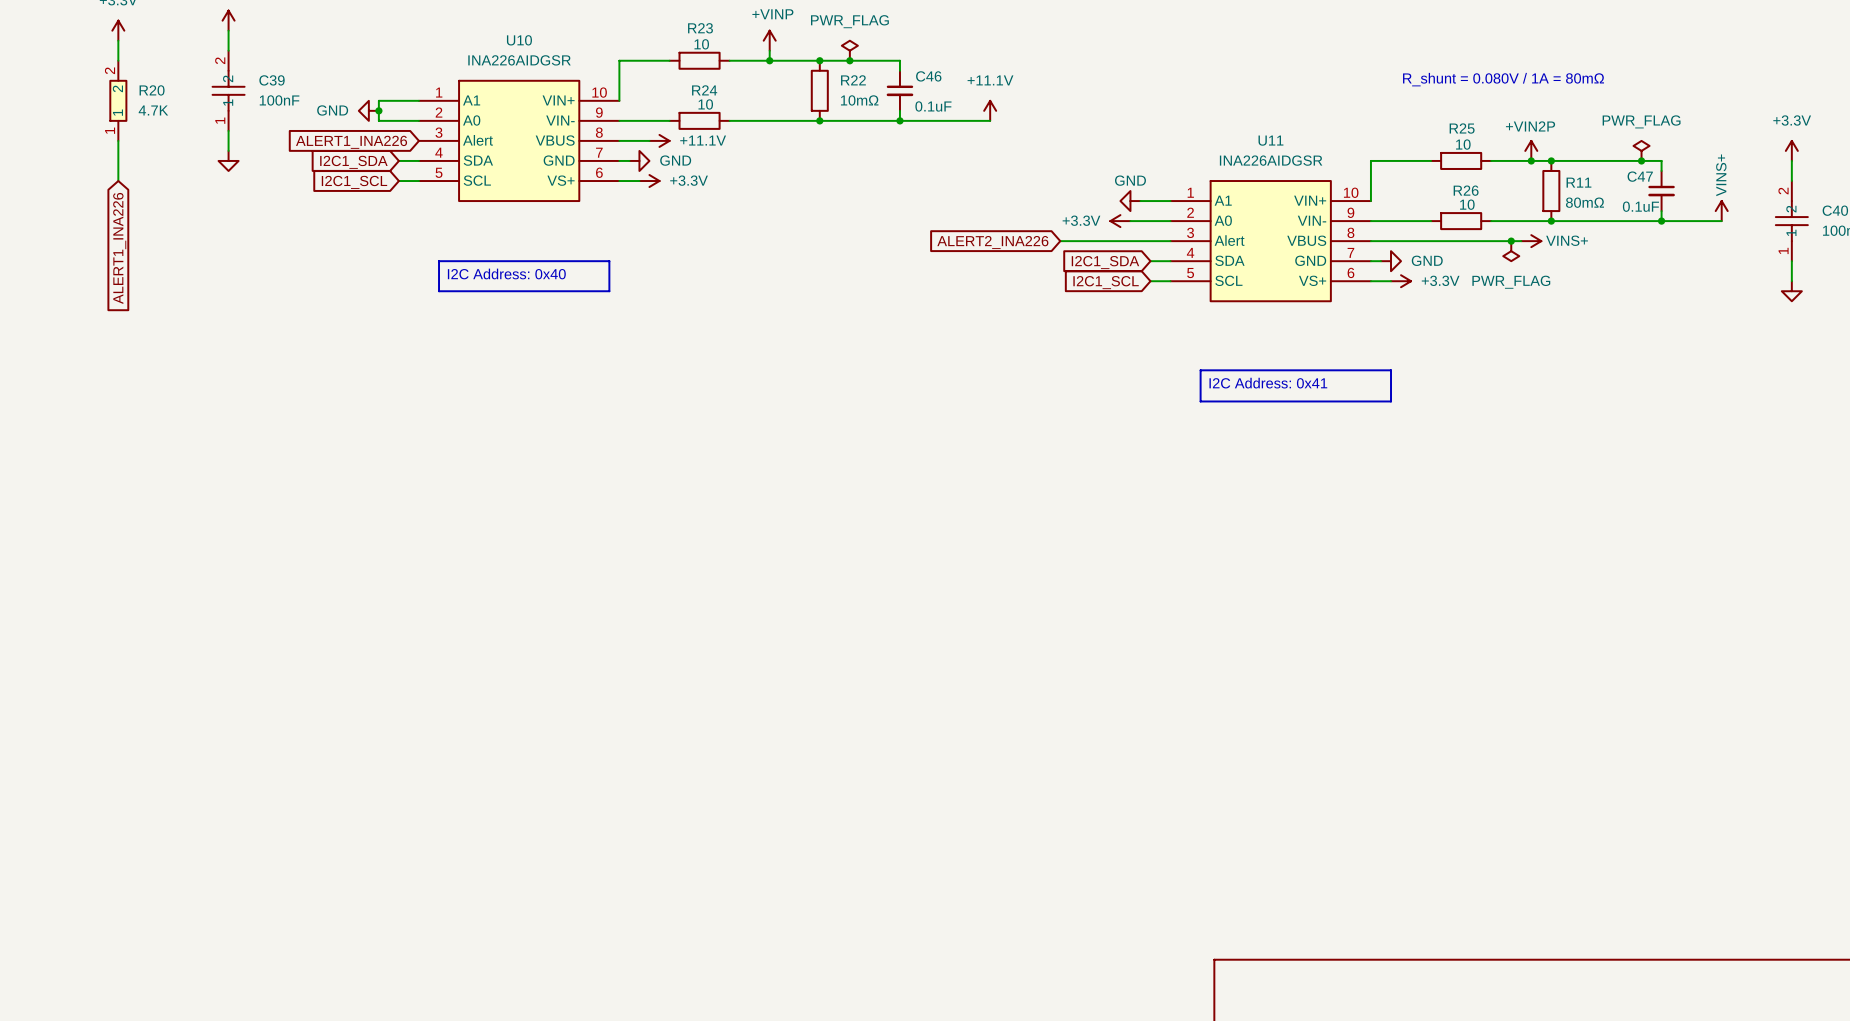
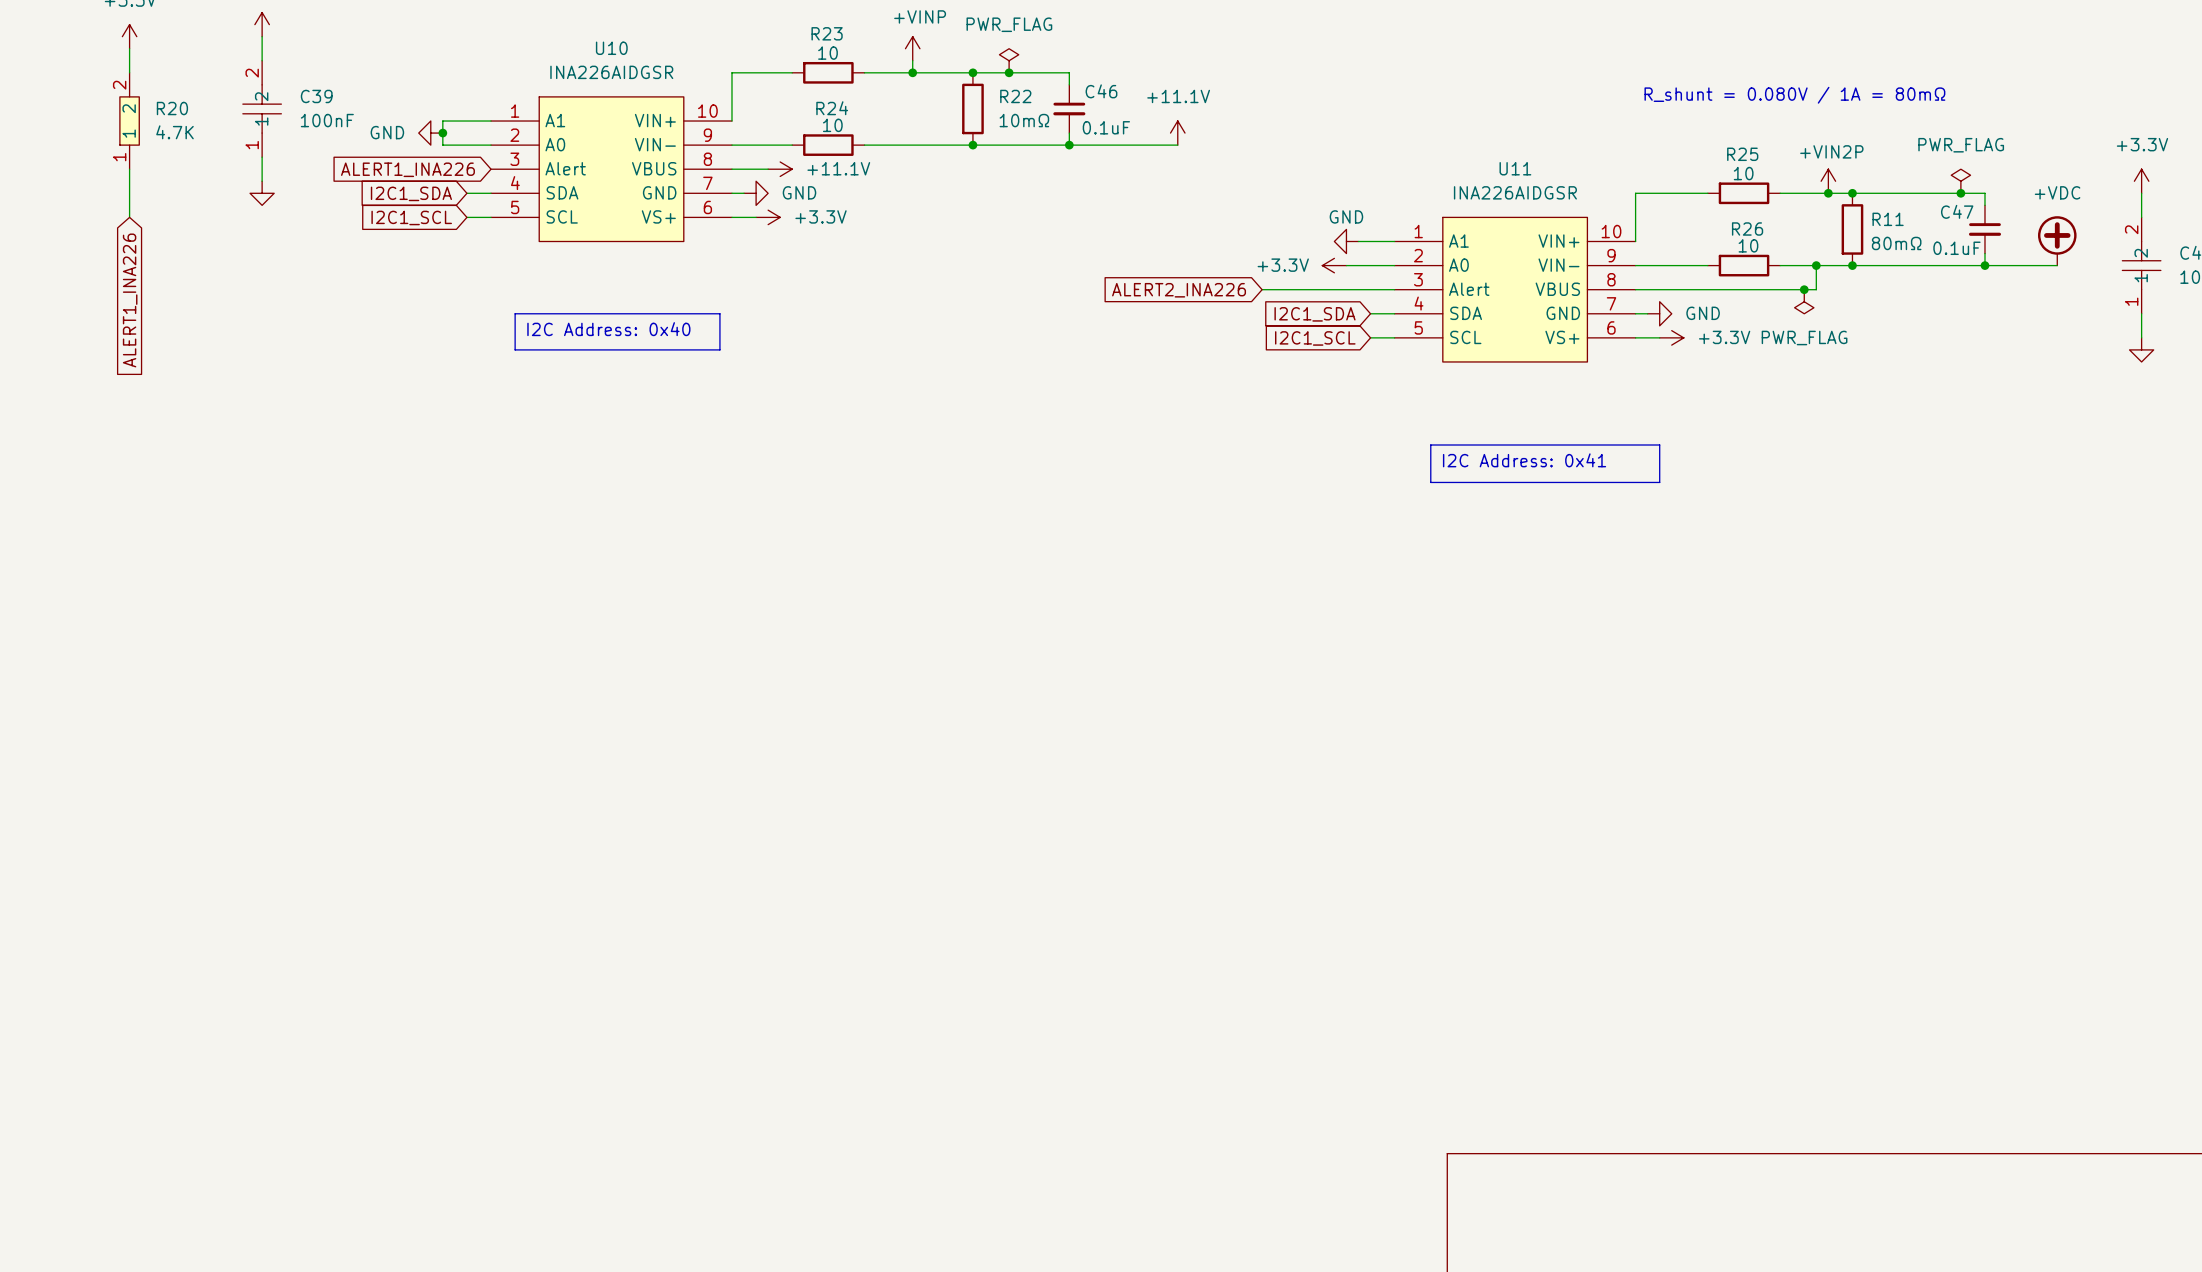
power symbol: none -> +VDC (2057, 240)
power symbol: VINS+ (1721, 211) -> none
wire: none -> (1816, 265) (1816, 289)
junction: none -> (1816, 265)
power symbol: VINS+ (1531, 241) -> none

